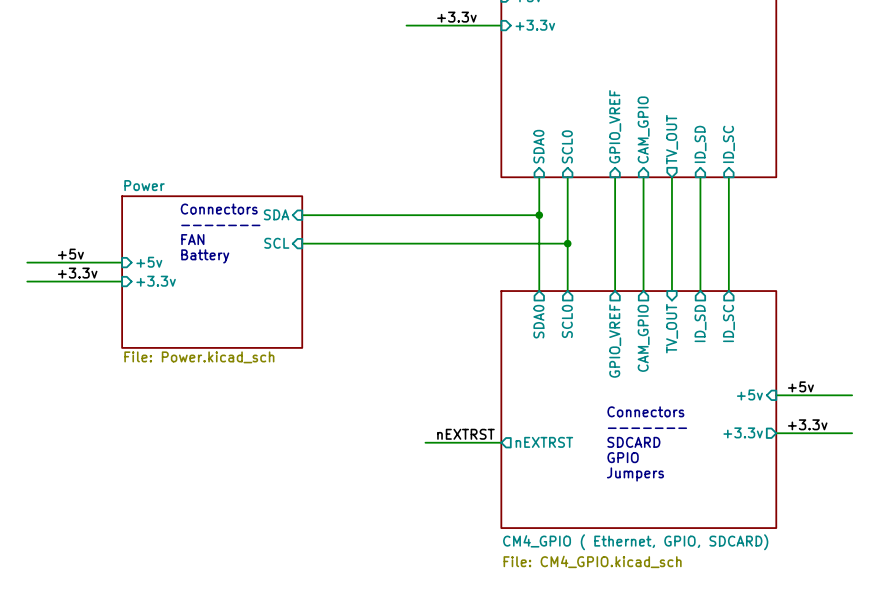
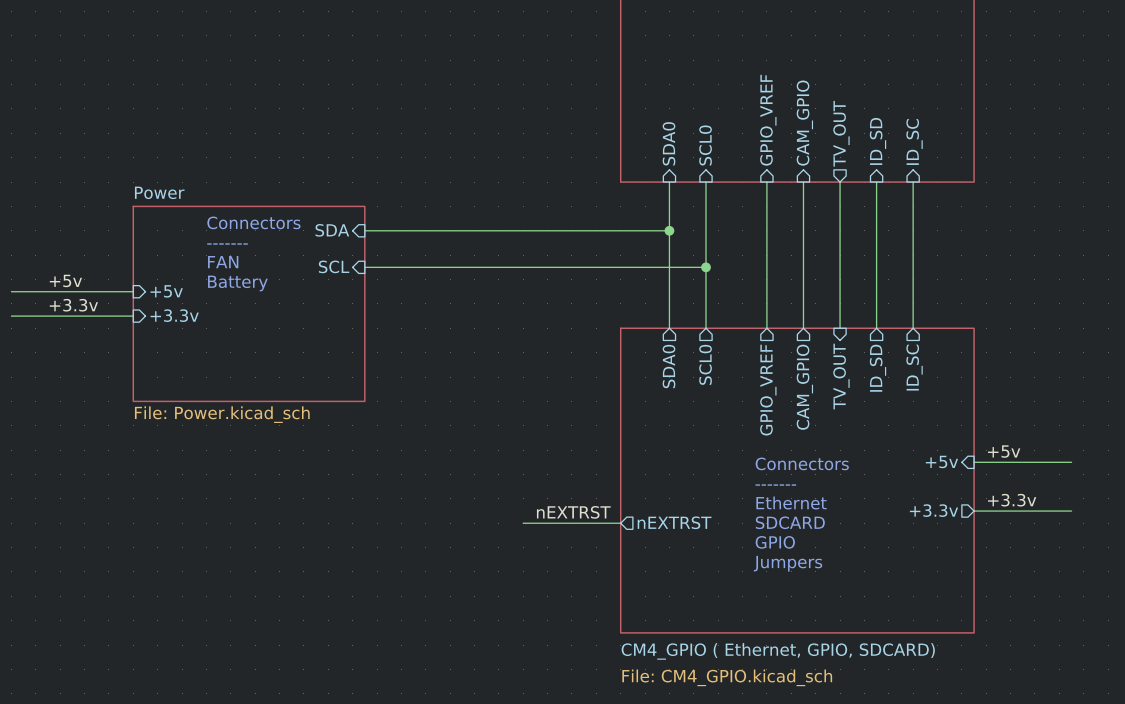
text: none -> Connectors (802, 463)
text: Connectors (645, 411) -> ------- (775, 485)
text: ------- (647, 428) -> Ethernet (791, 503)

